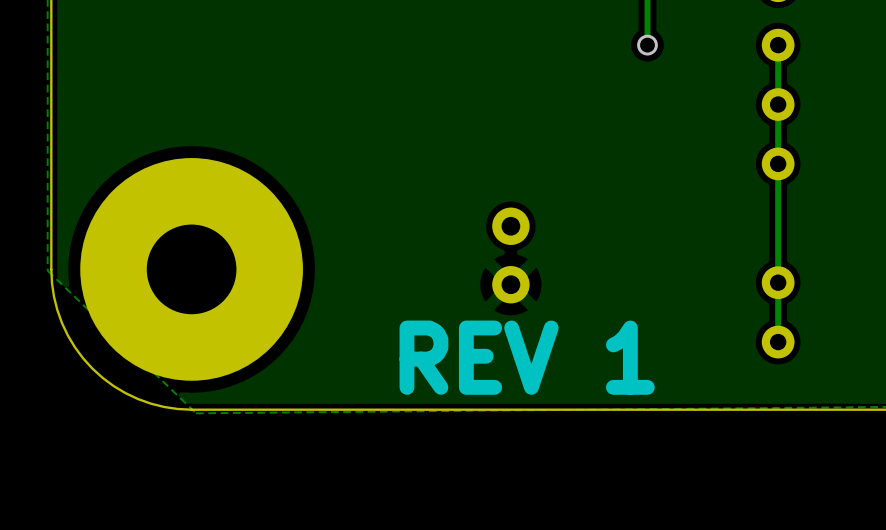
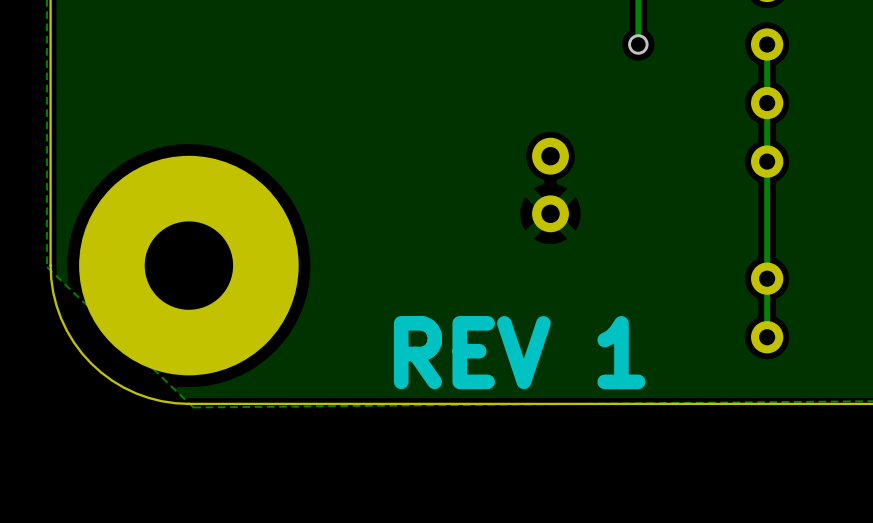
part position: (510, 255) -> (550, 185)

